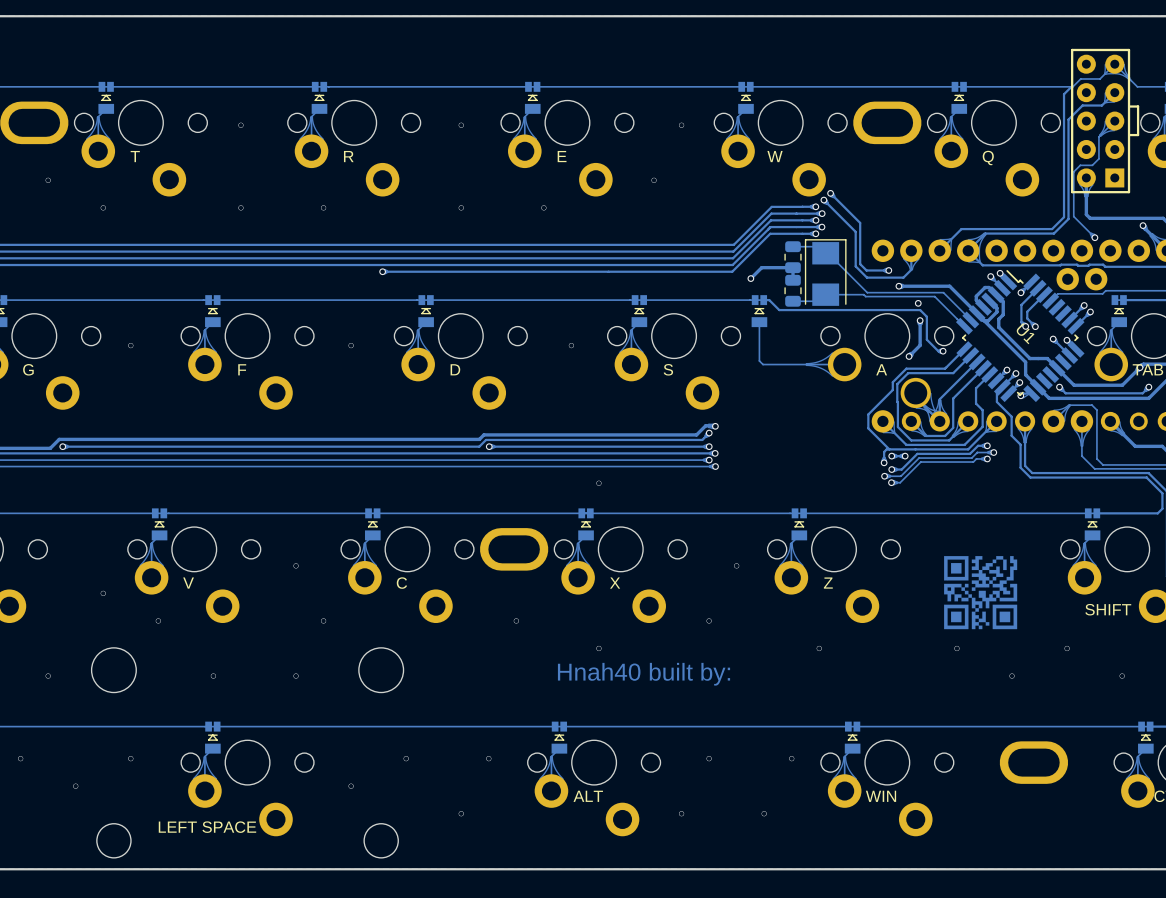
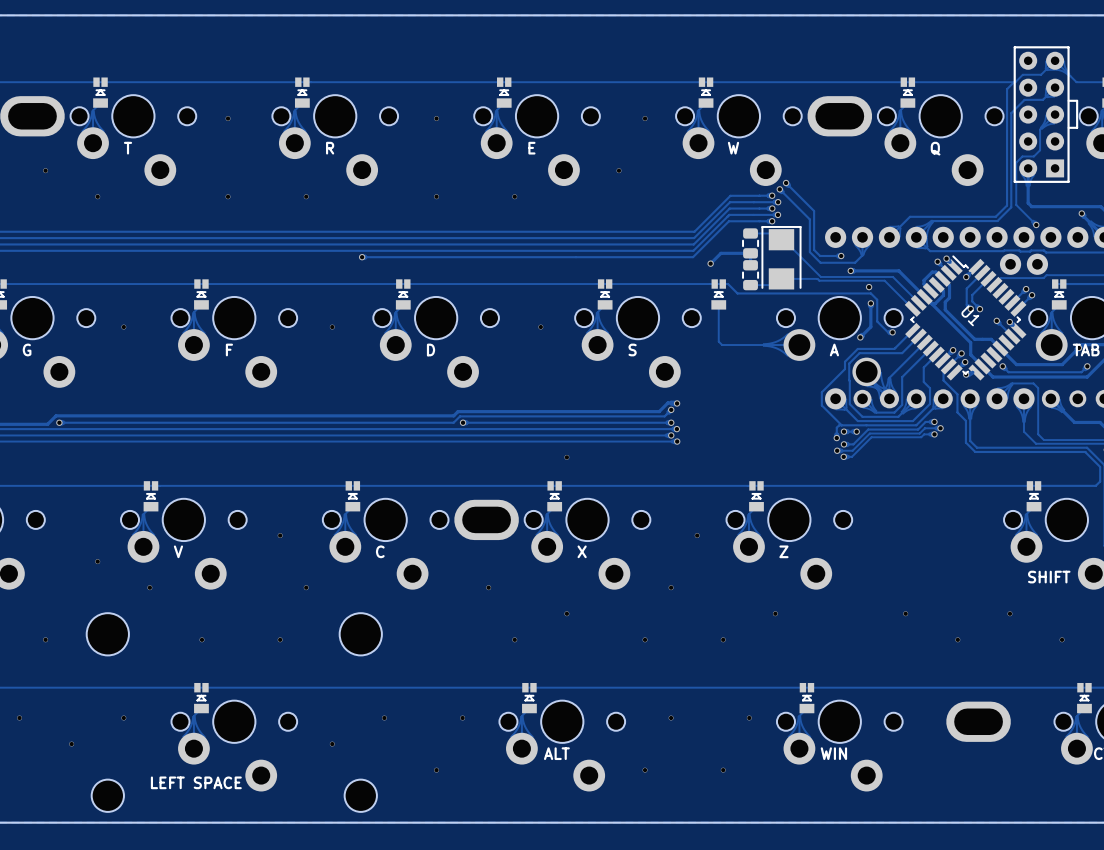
drawing: [944, 556, 1018, 630] -> none
text: Hnah40 built by: (644, 674) -> none
via: none -> (514, 639)
via: none -> (645, 639)
via: none -> (723, 639)

